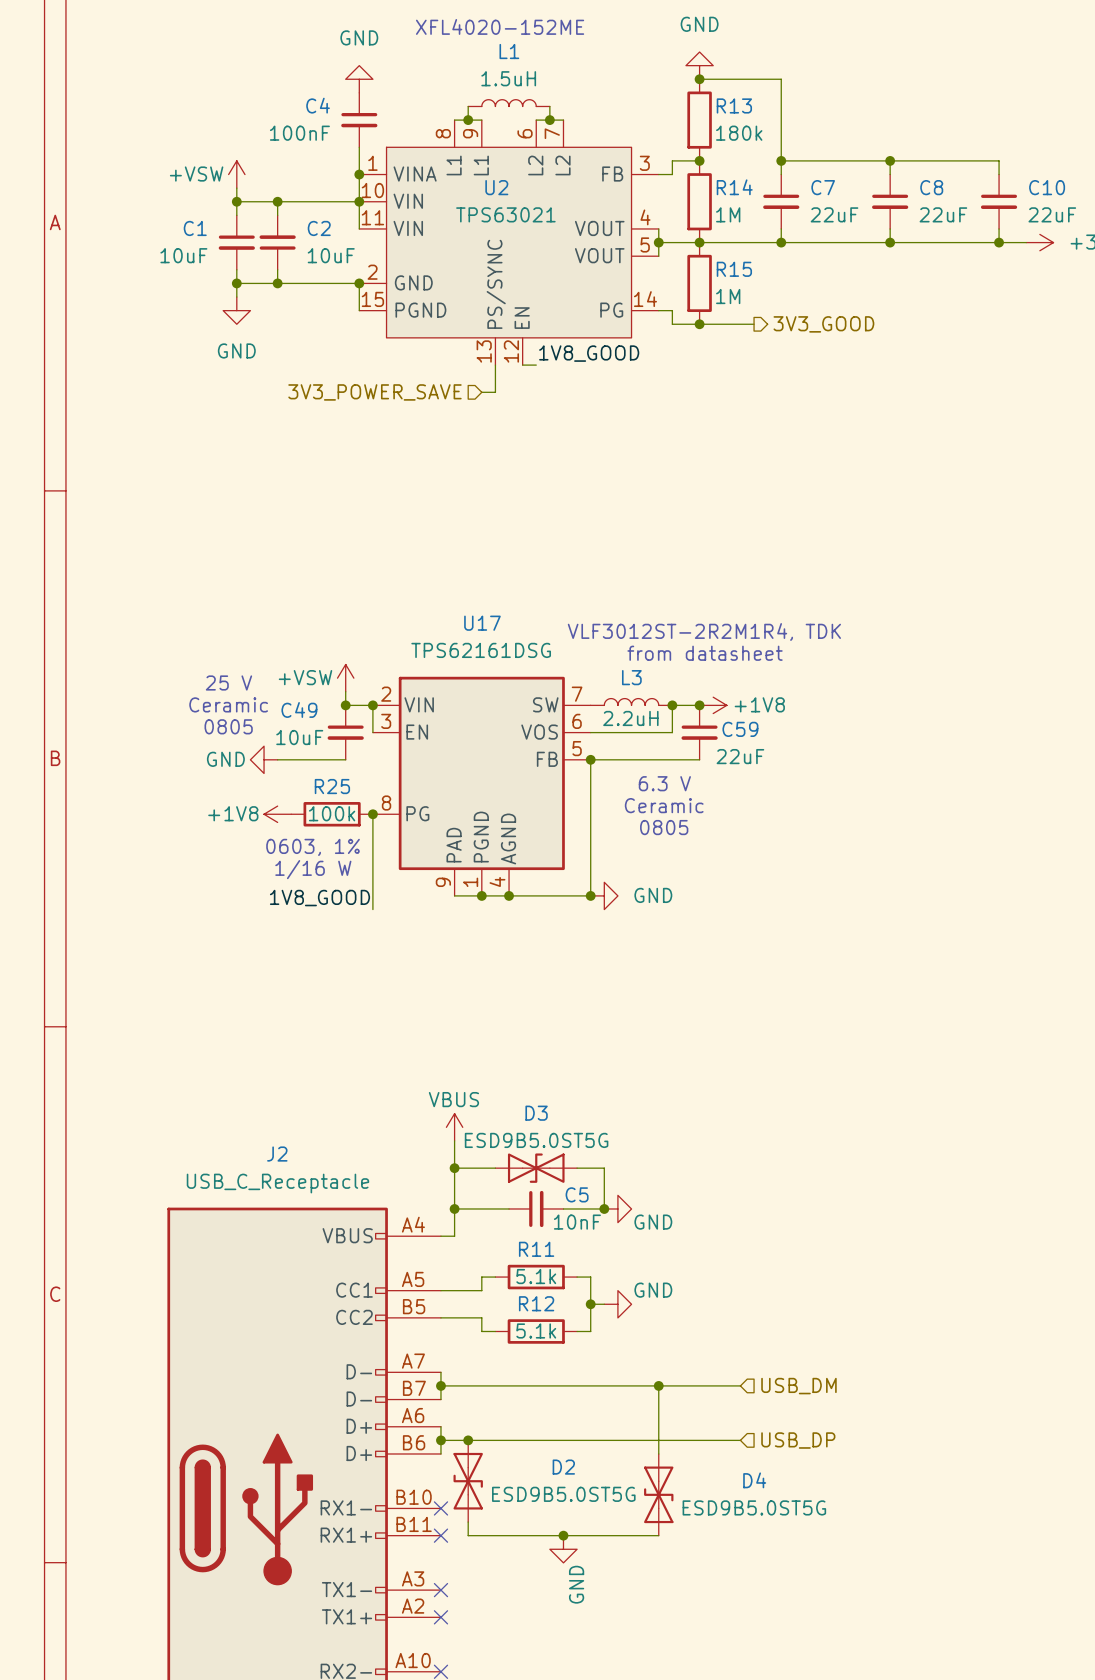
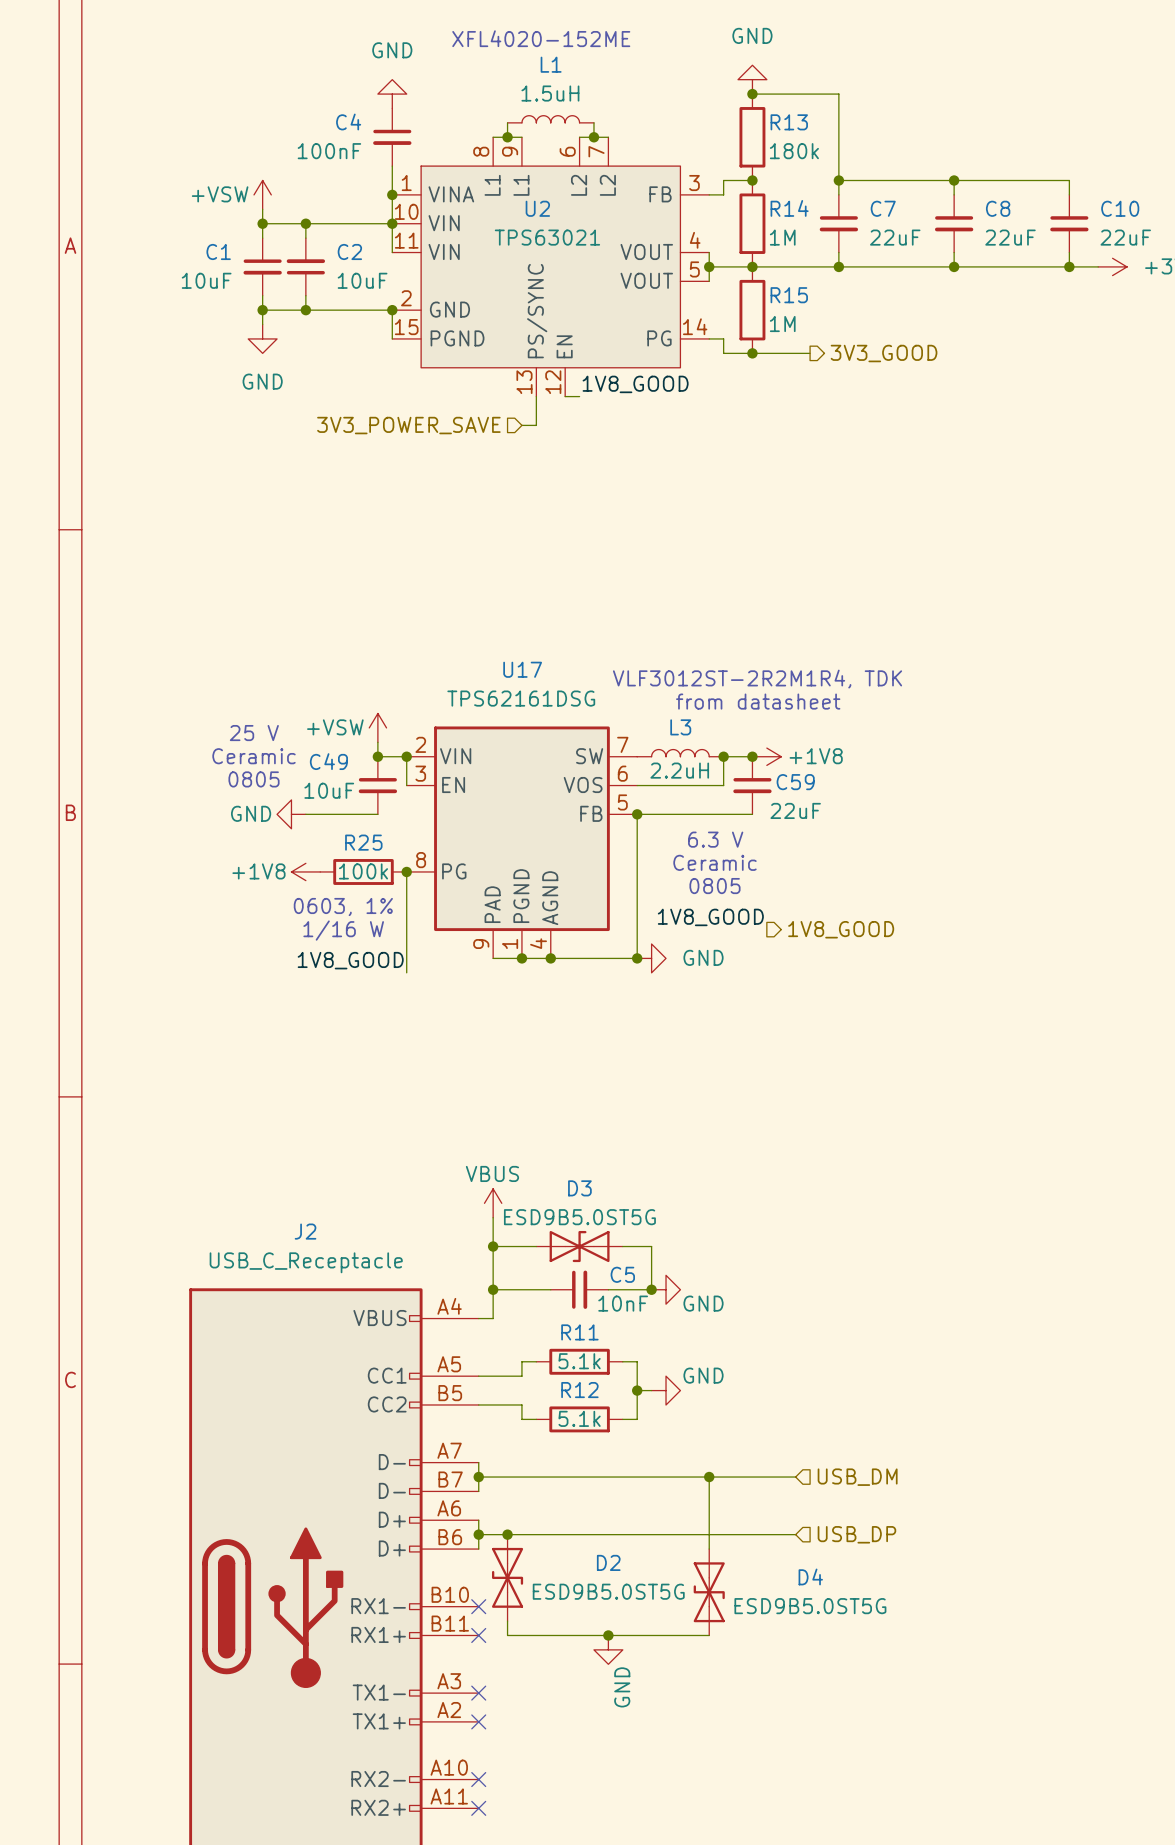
label: none -> 1V8_GOOD (710, 917)
hierarchical label: none -> 1V8_GOOD (841, 929)

